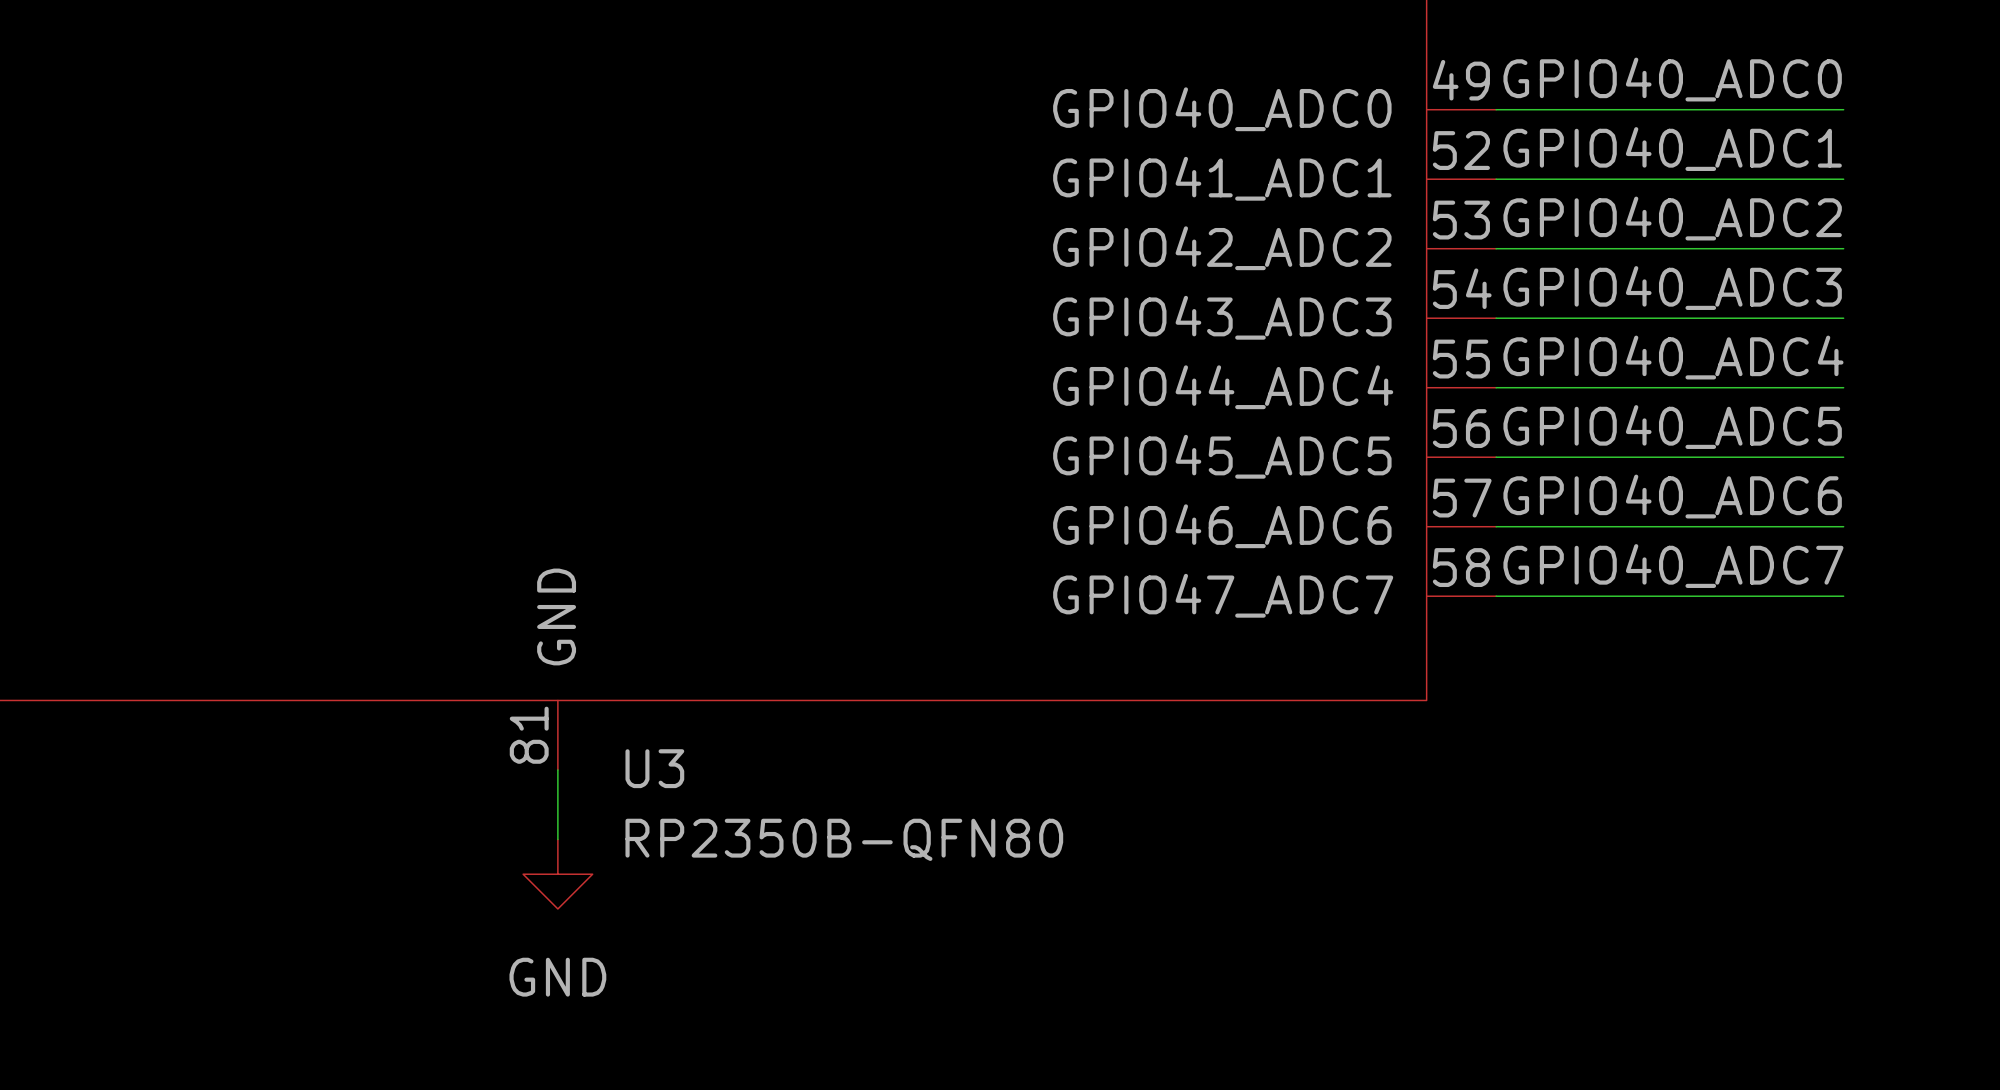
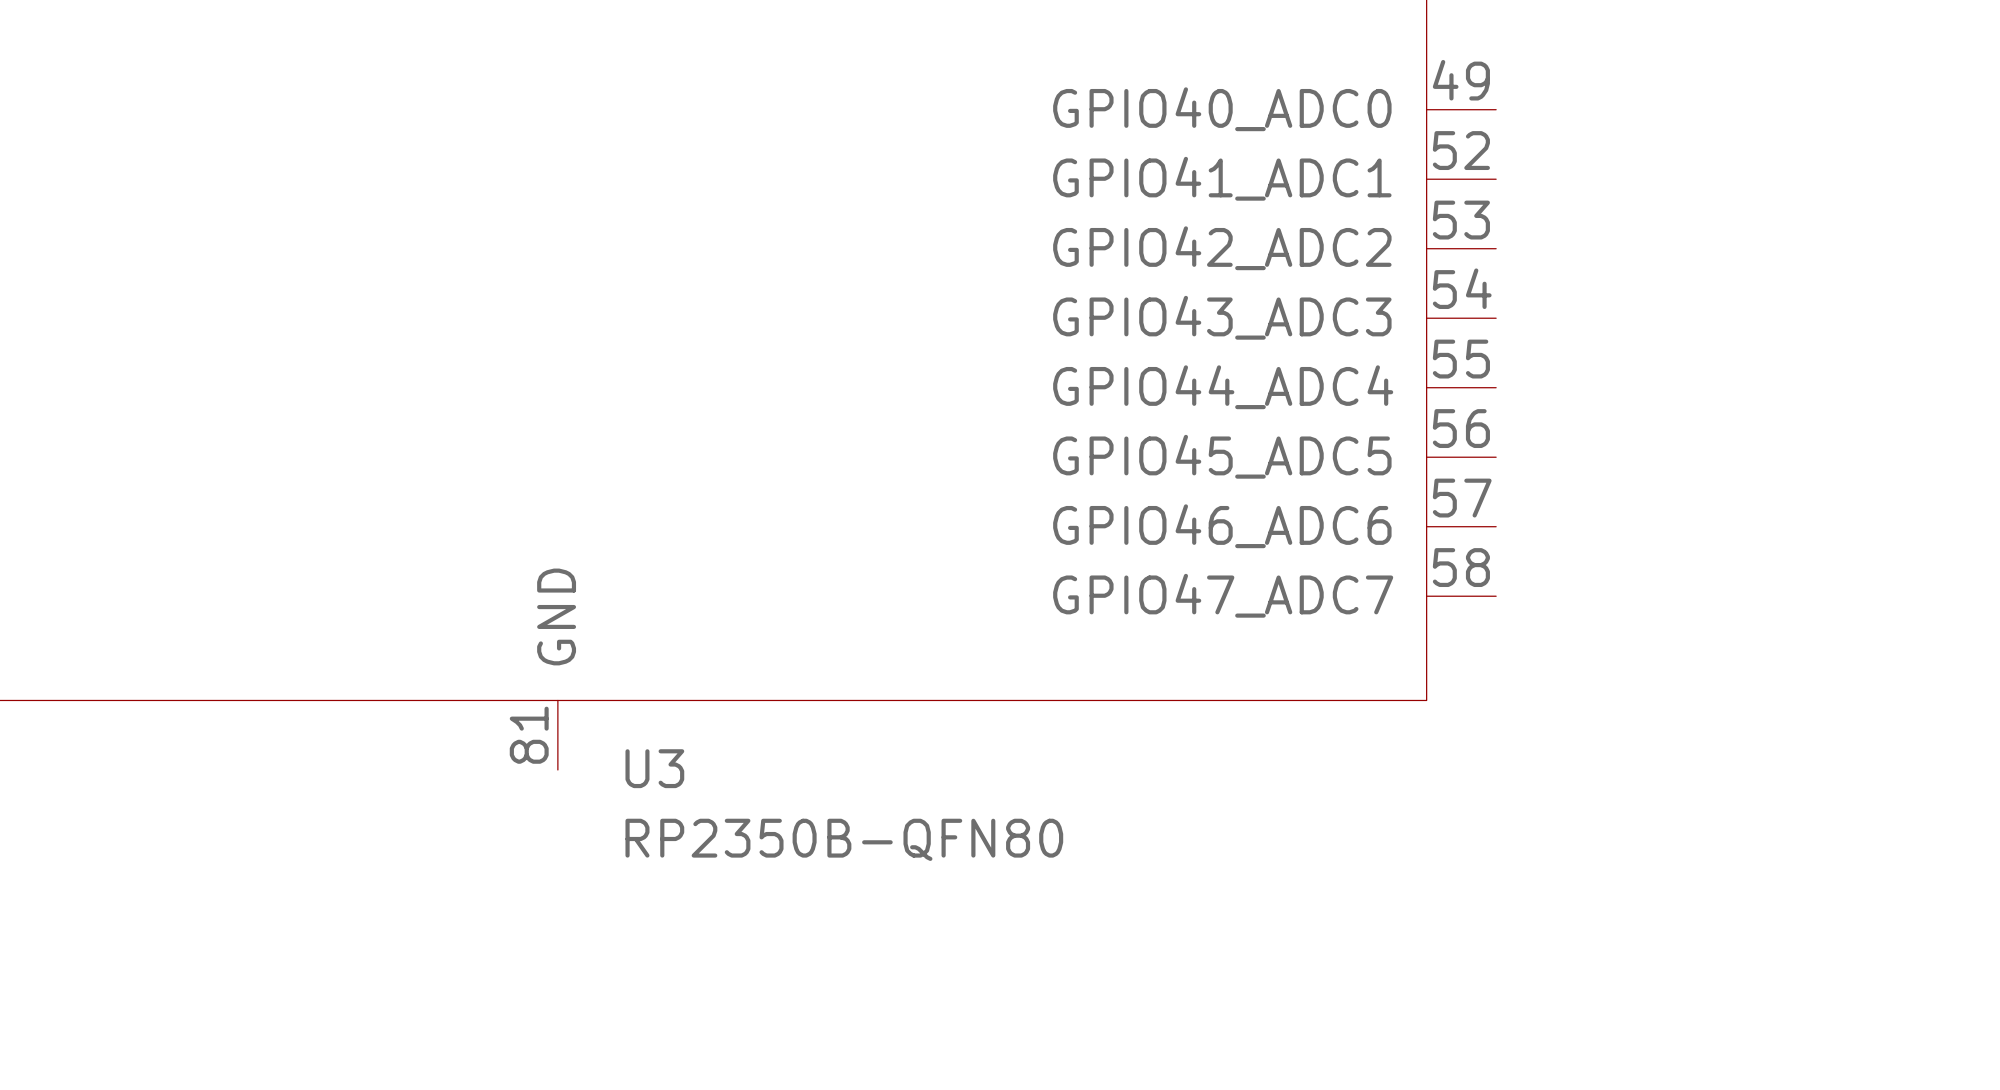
label: GPIO40_ADC0 (1672, 79) -> none
wire: (1496, 109) (1843, 109) -> none
label: GPIO40_ADC1 (1672, 149) -> none
wire: (1496, 179) (1843, 179) -> none
label: GPIO40_ADC2 (1672, 218) -> none
wire: (1496, 248) (1843, 248) -> none
label: GPIO40_ADC3 (1672, 288) -> none
wire: (1496, 318) (1843, 318) -> none
label: GPIO40_ADC4 (1673, 357) -> none
wire: (1496, 387) (1843, 387) -> none
label: GPIO40_ADC5 (1672, 427) -> none
wire: (1496, 457) (1843, 457) -> none
label: GPIO40_ADC6 (1672, 496) -> none
wire: (1496, 526) (1843, 526) -> none
label: GPIO40_ADC7 (1673, 566) -> none
wire: (1496, 596) (1843, 596) -> none
wire: (557, 769) (557, 839) -> none
power symbol: GND (557, 874) -> none

